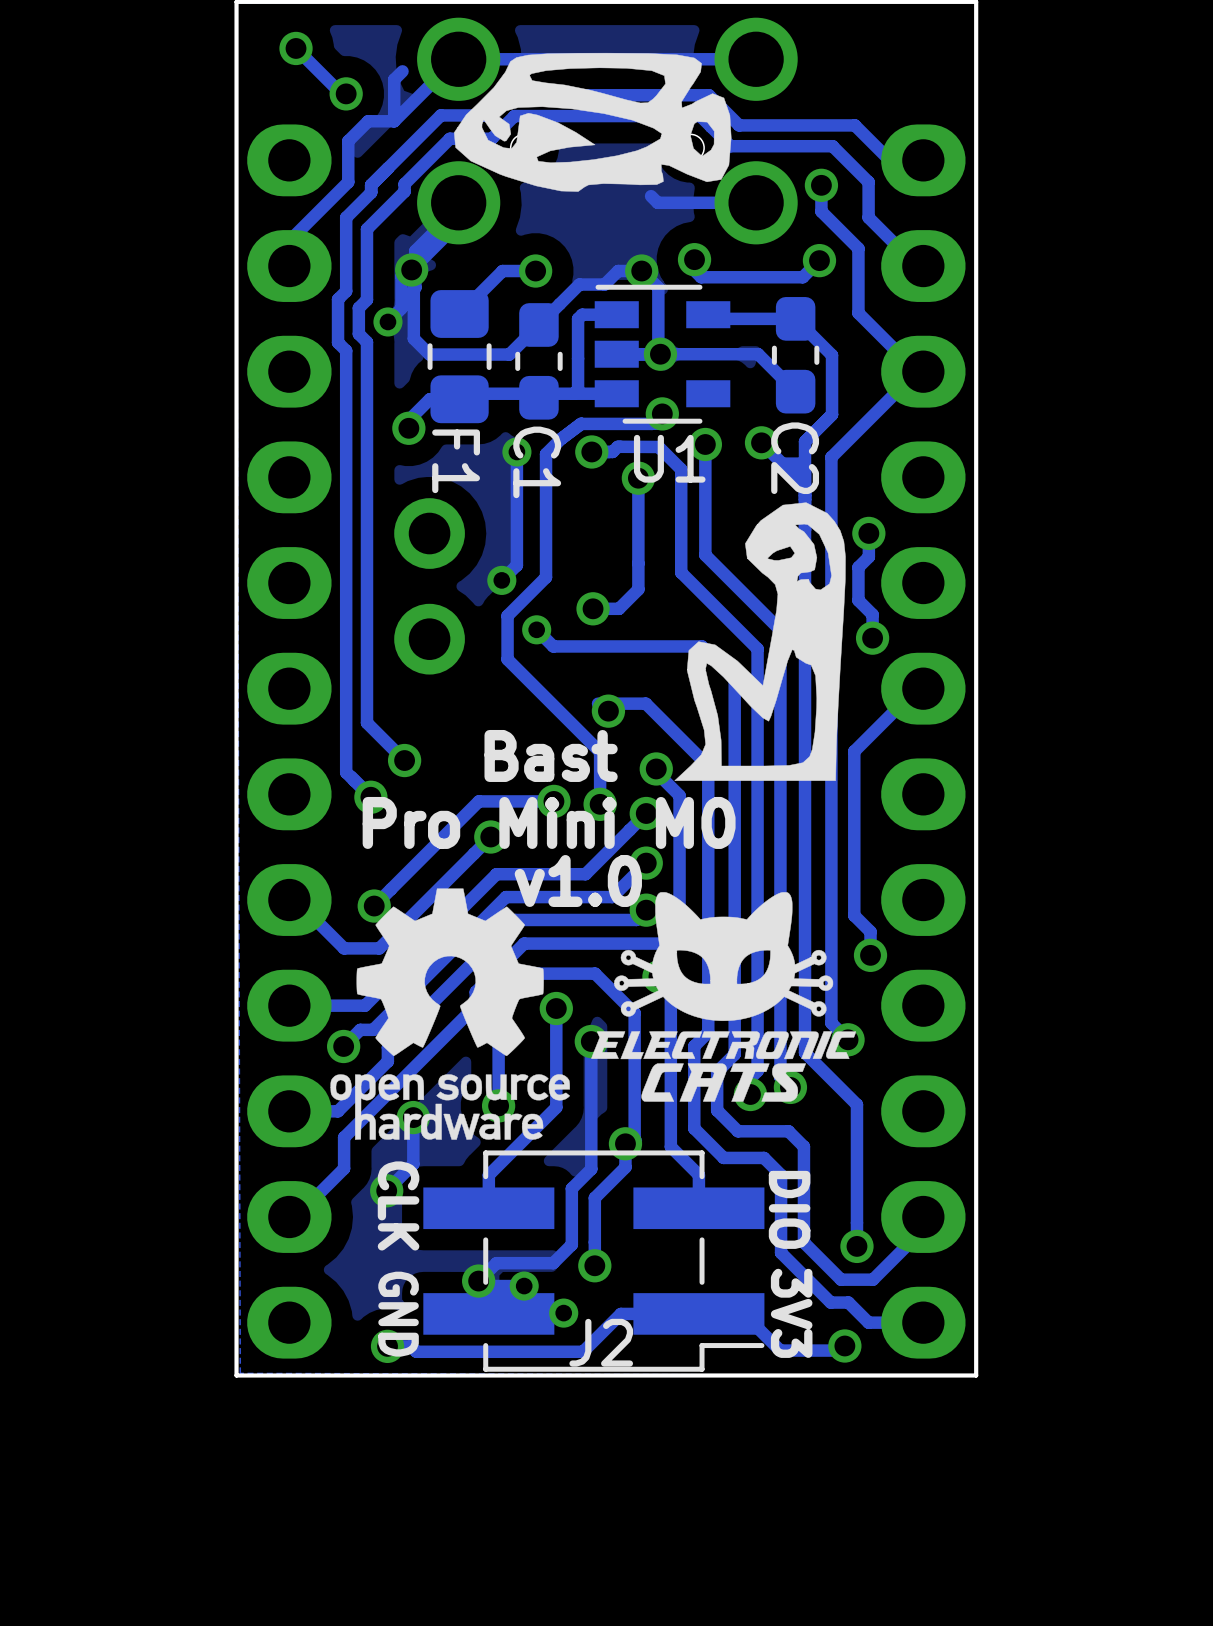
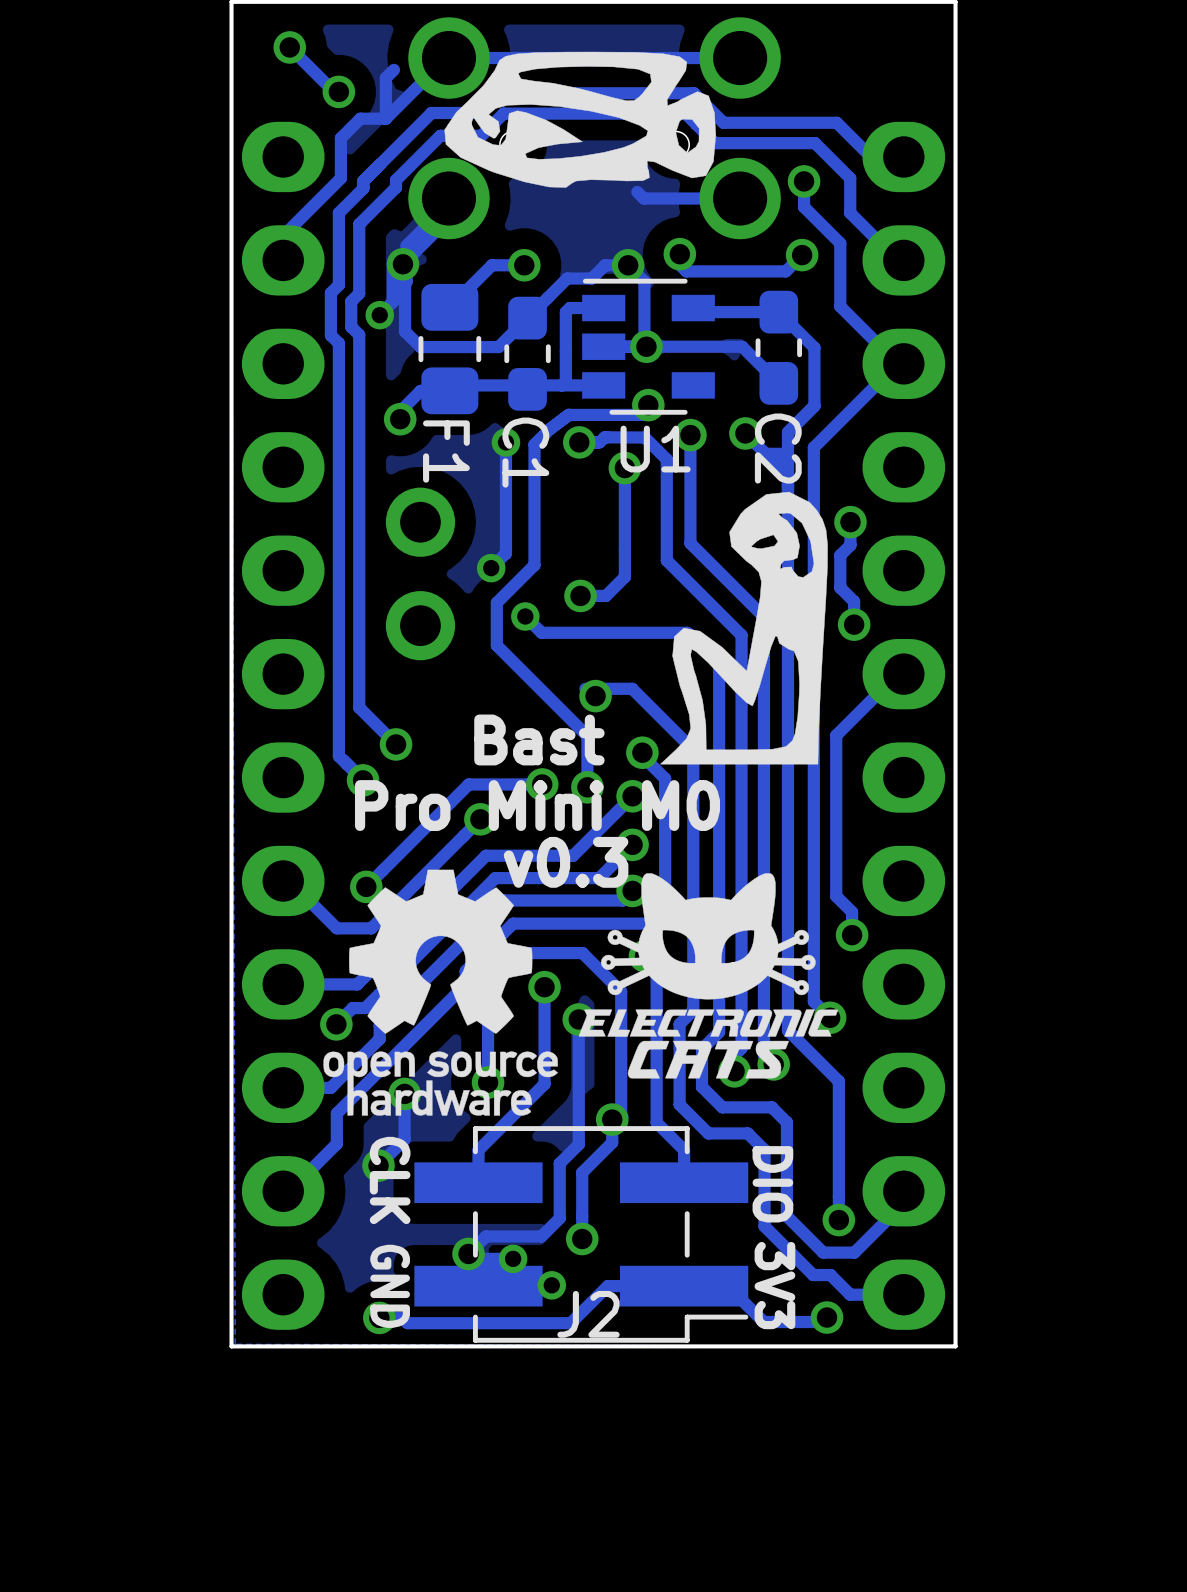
text: v1.0 (578, 880) -> v0.3 (566, 862)

